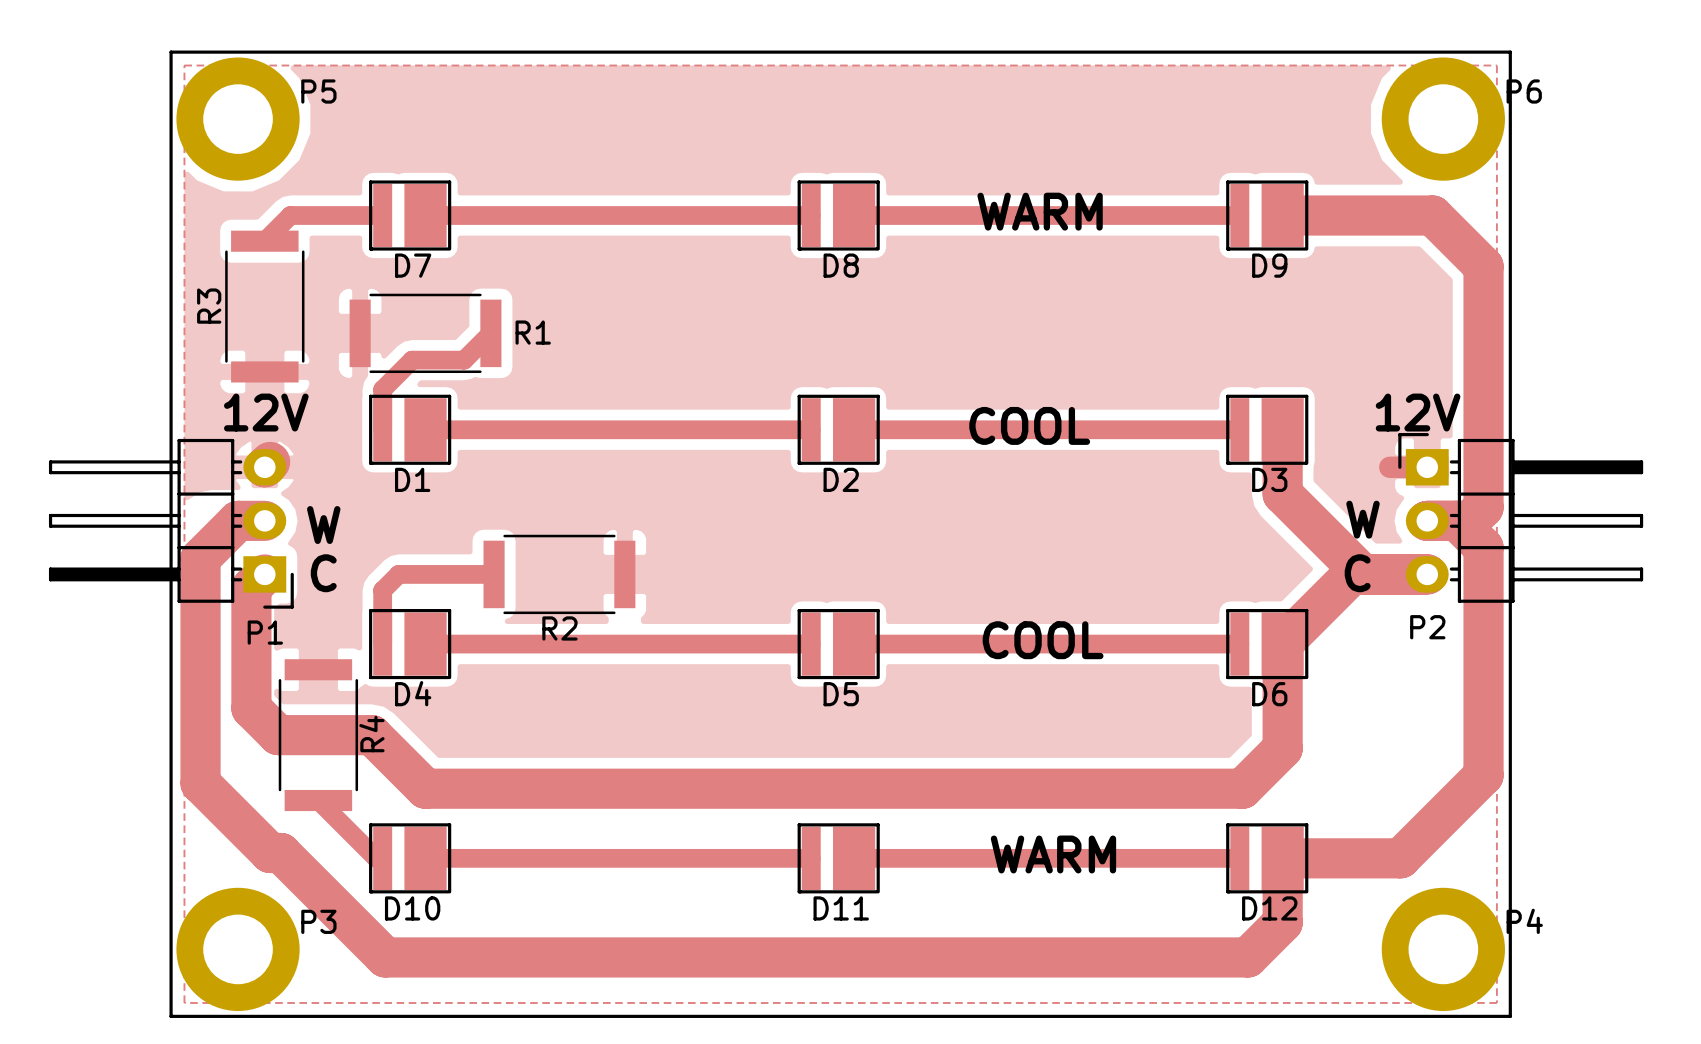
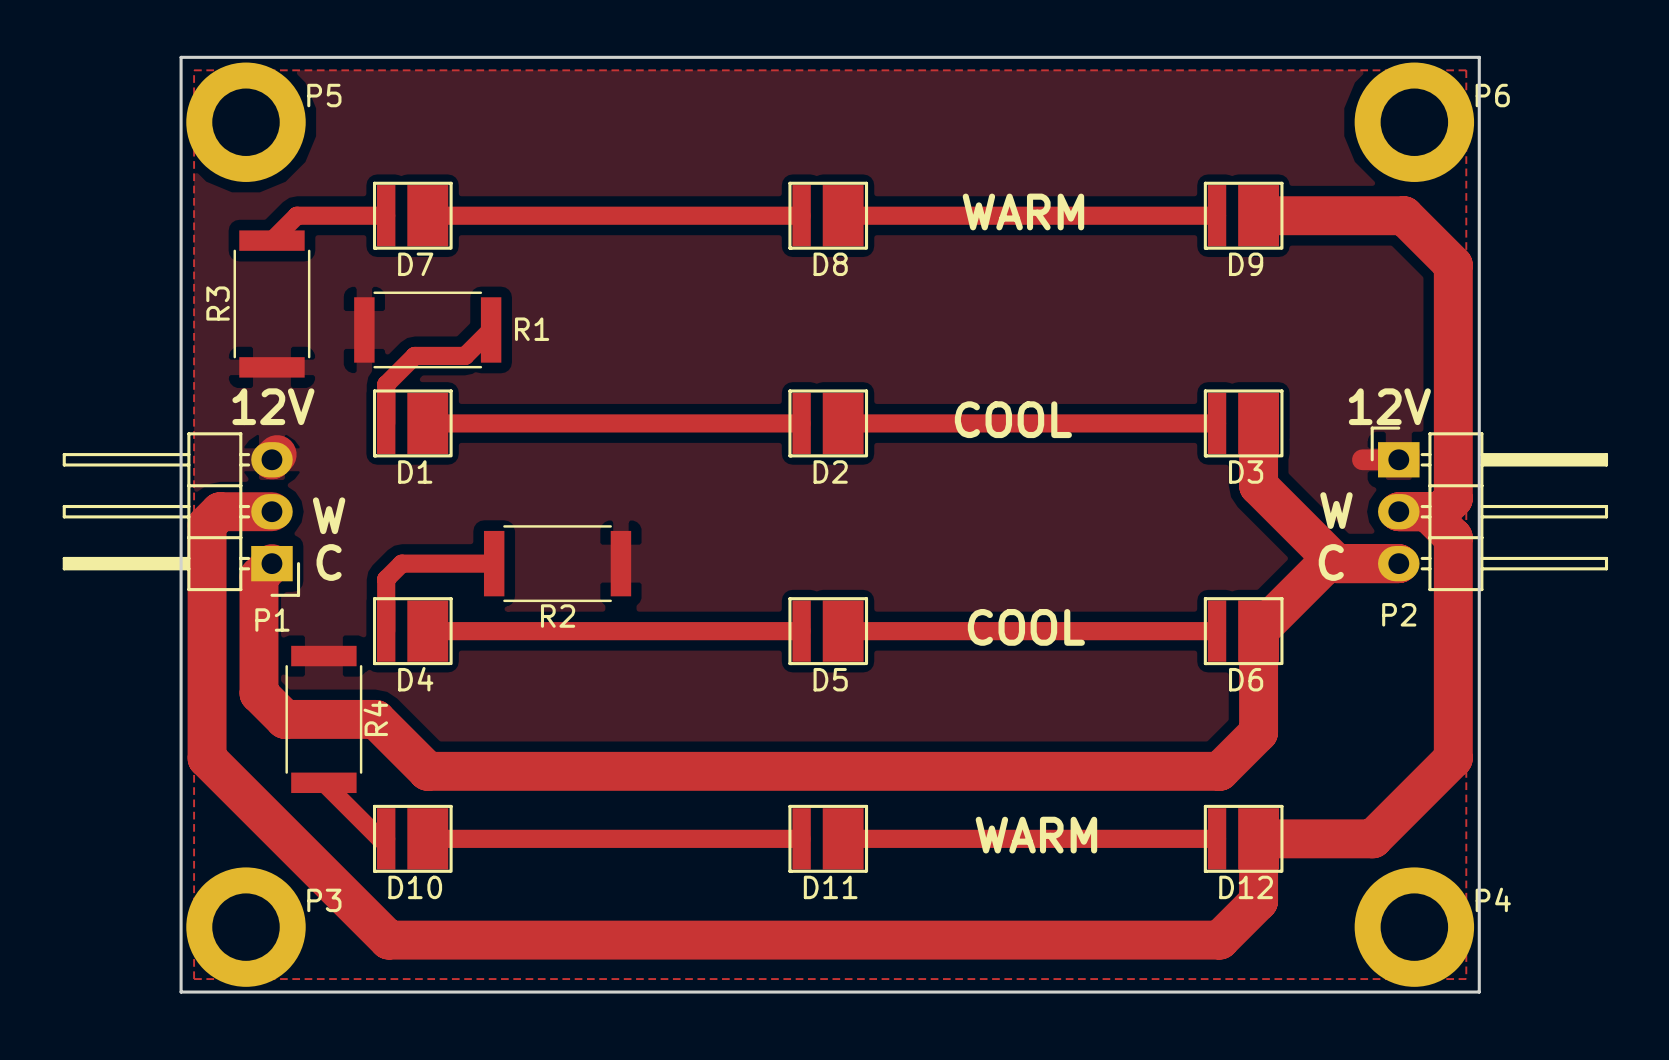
track: (238, 520) (200, 558) (200, 783) (270, 852) (280, 852) (385, 957) (1247, 957) -> (246, 511) (220, 511) (207, 524) (207, 758) (388, 940) (1219, 940) (1224, 934)

